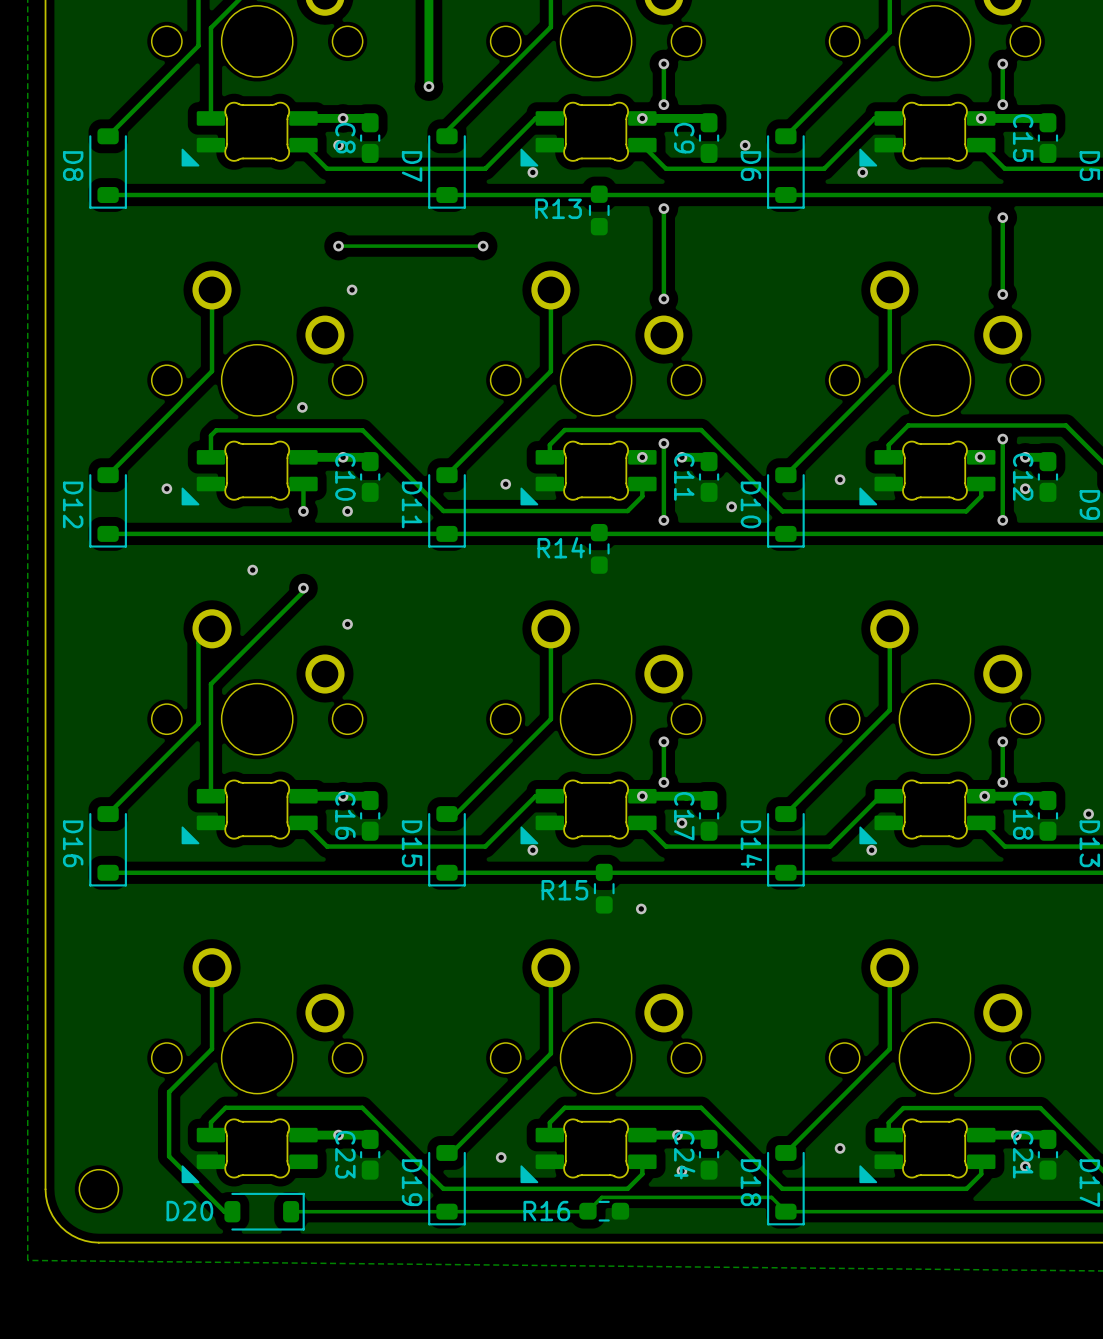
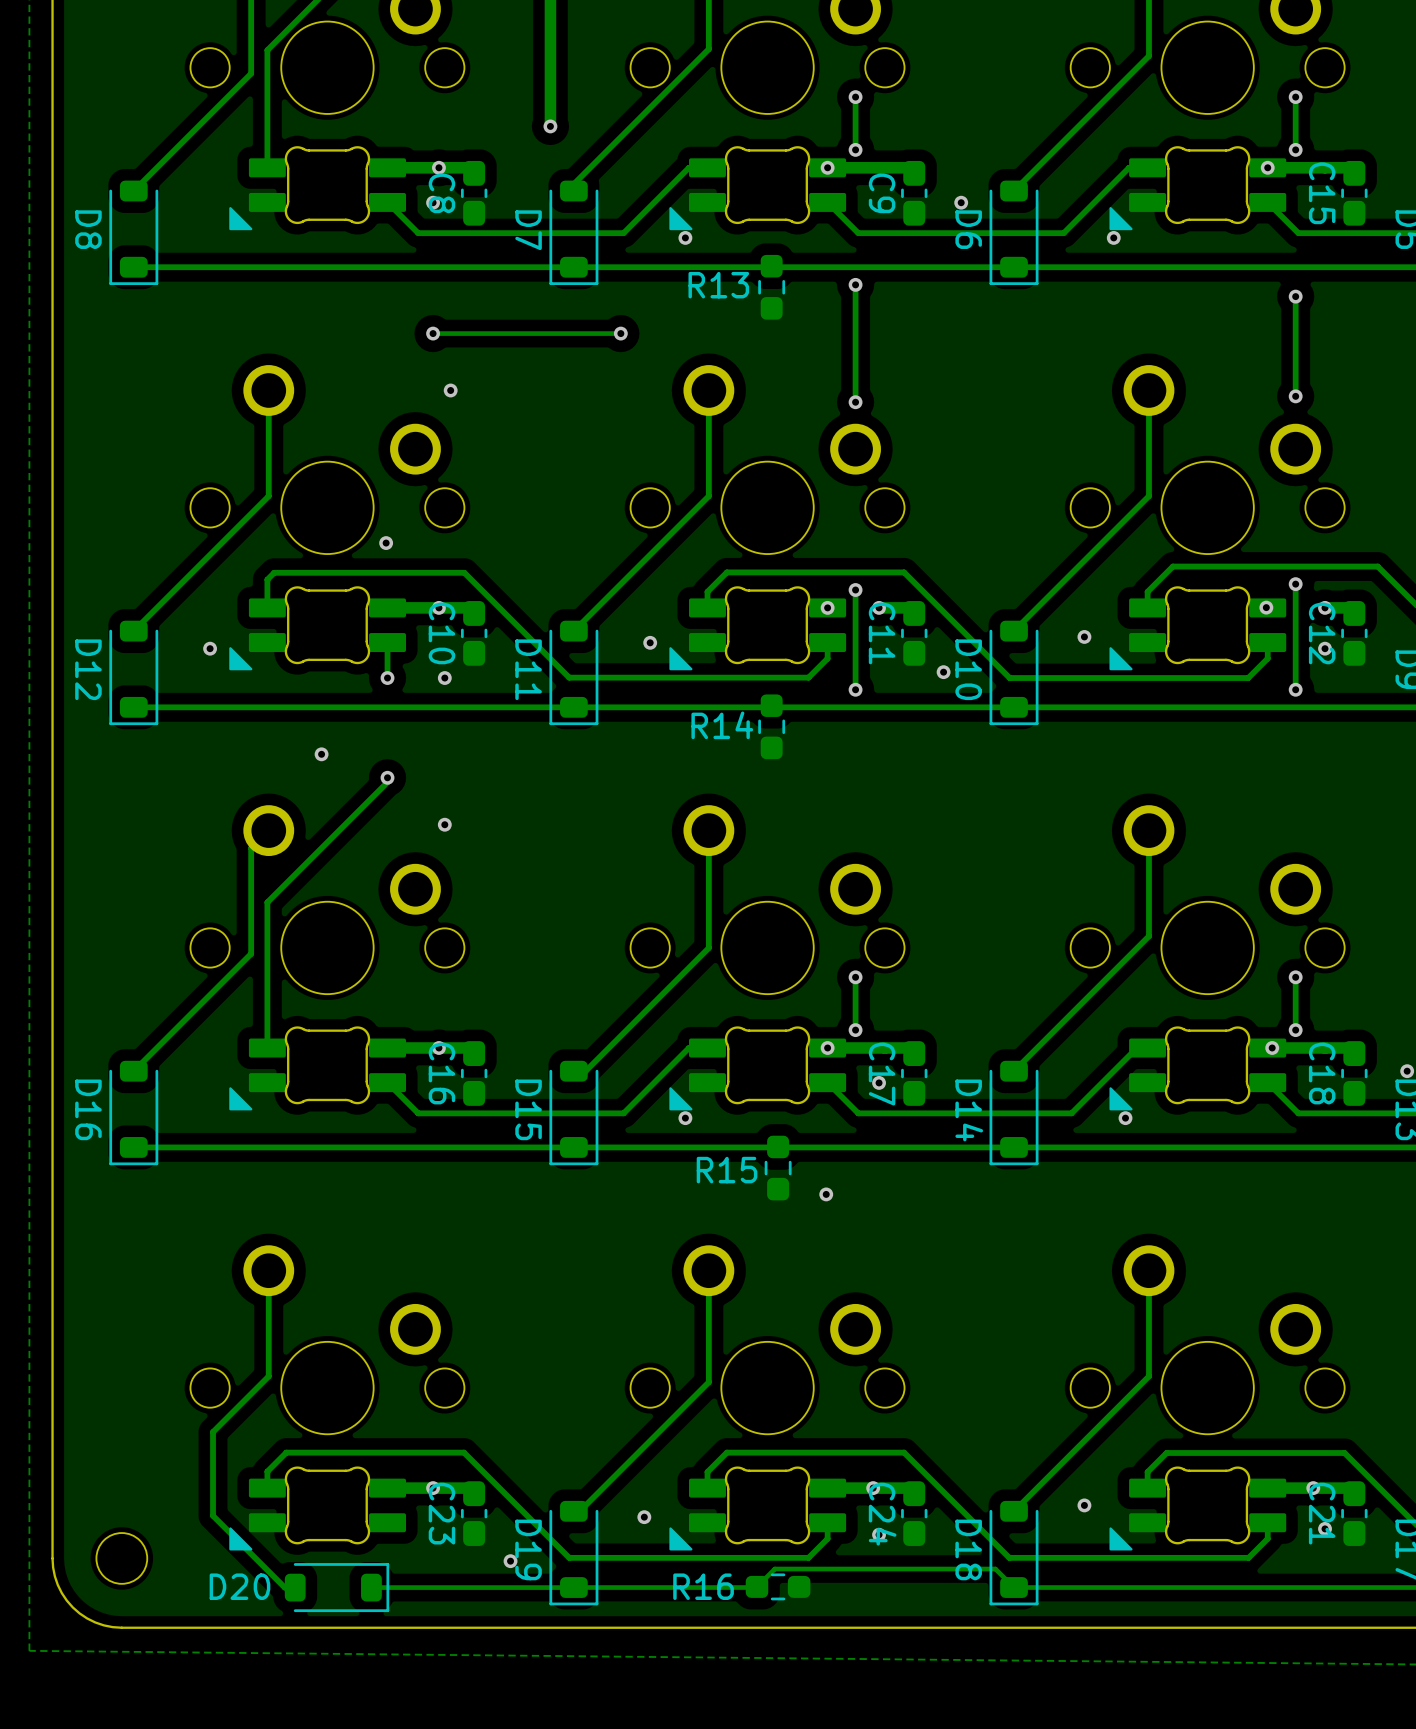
via: none -> (510, 1561)

